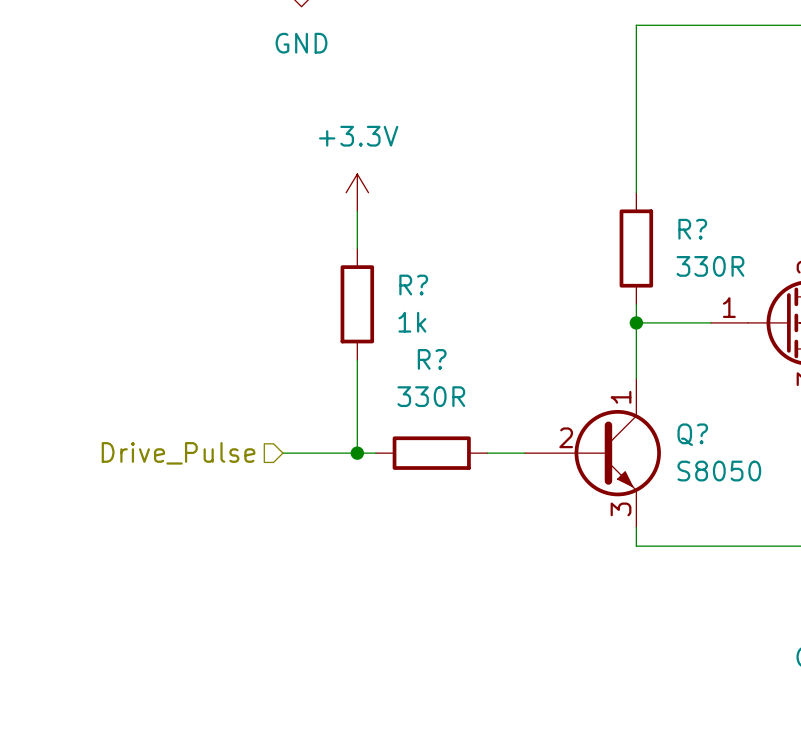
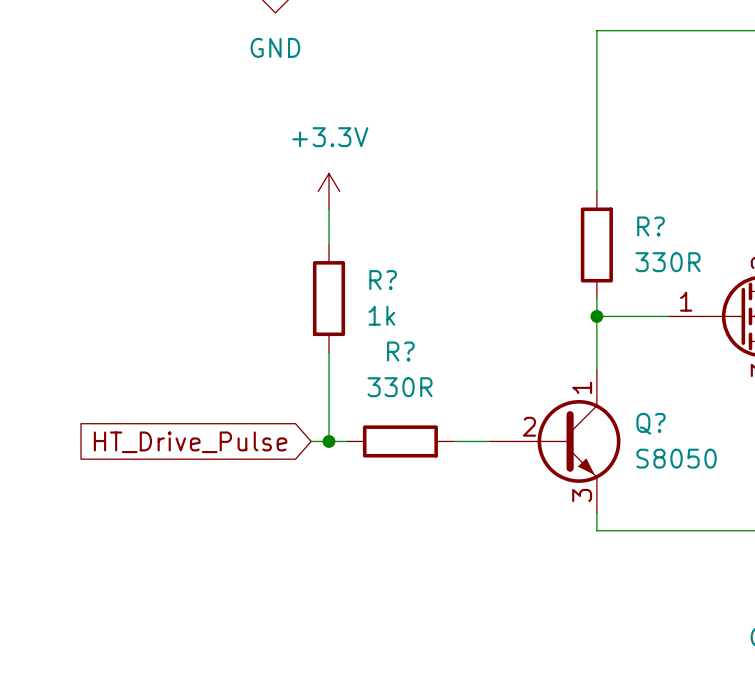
hierarchical label: Drive_Pulse (178, 453) -> none
wire: (282, 453) (338, 453) -> none
global label: none -> HT_Drive_Pulse (190, 442)

